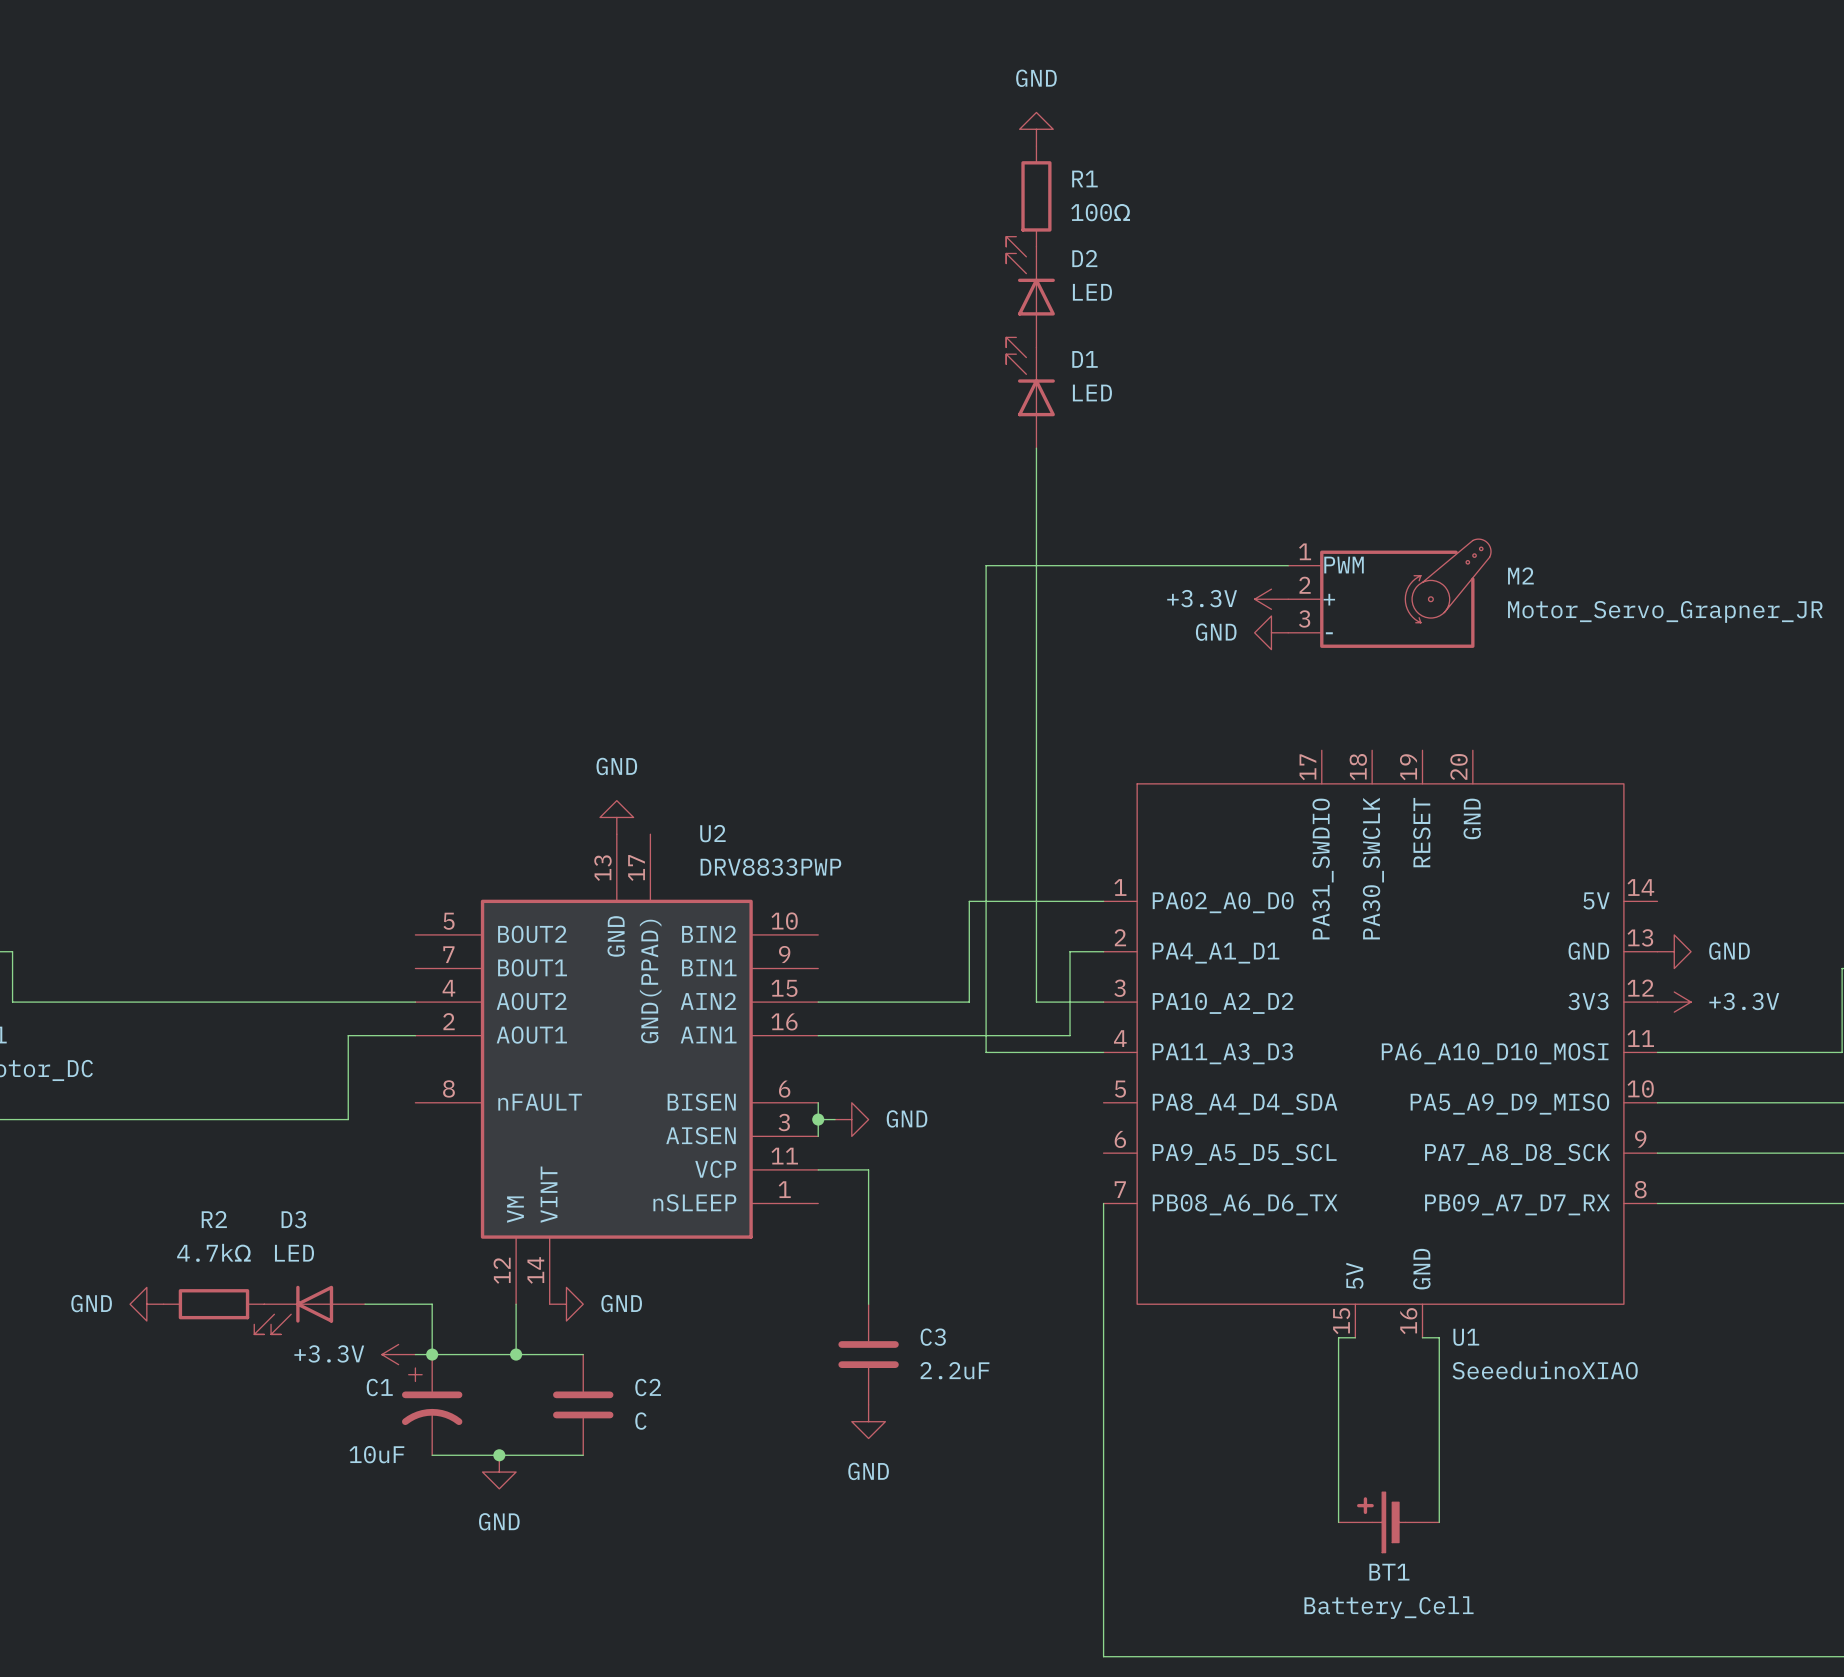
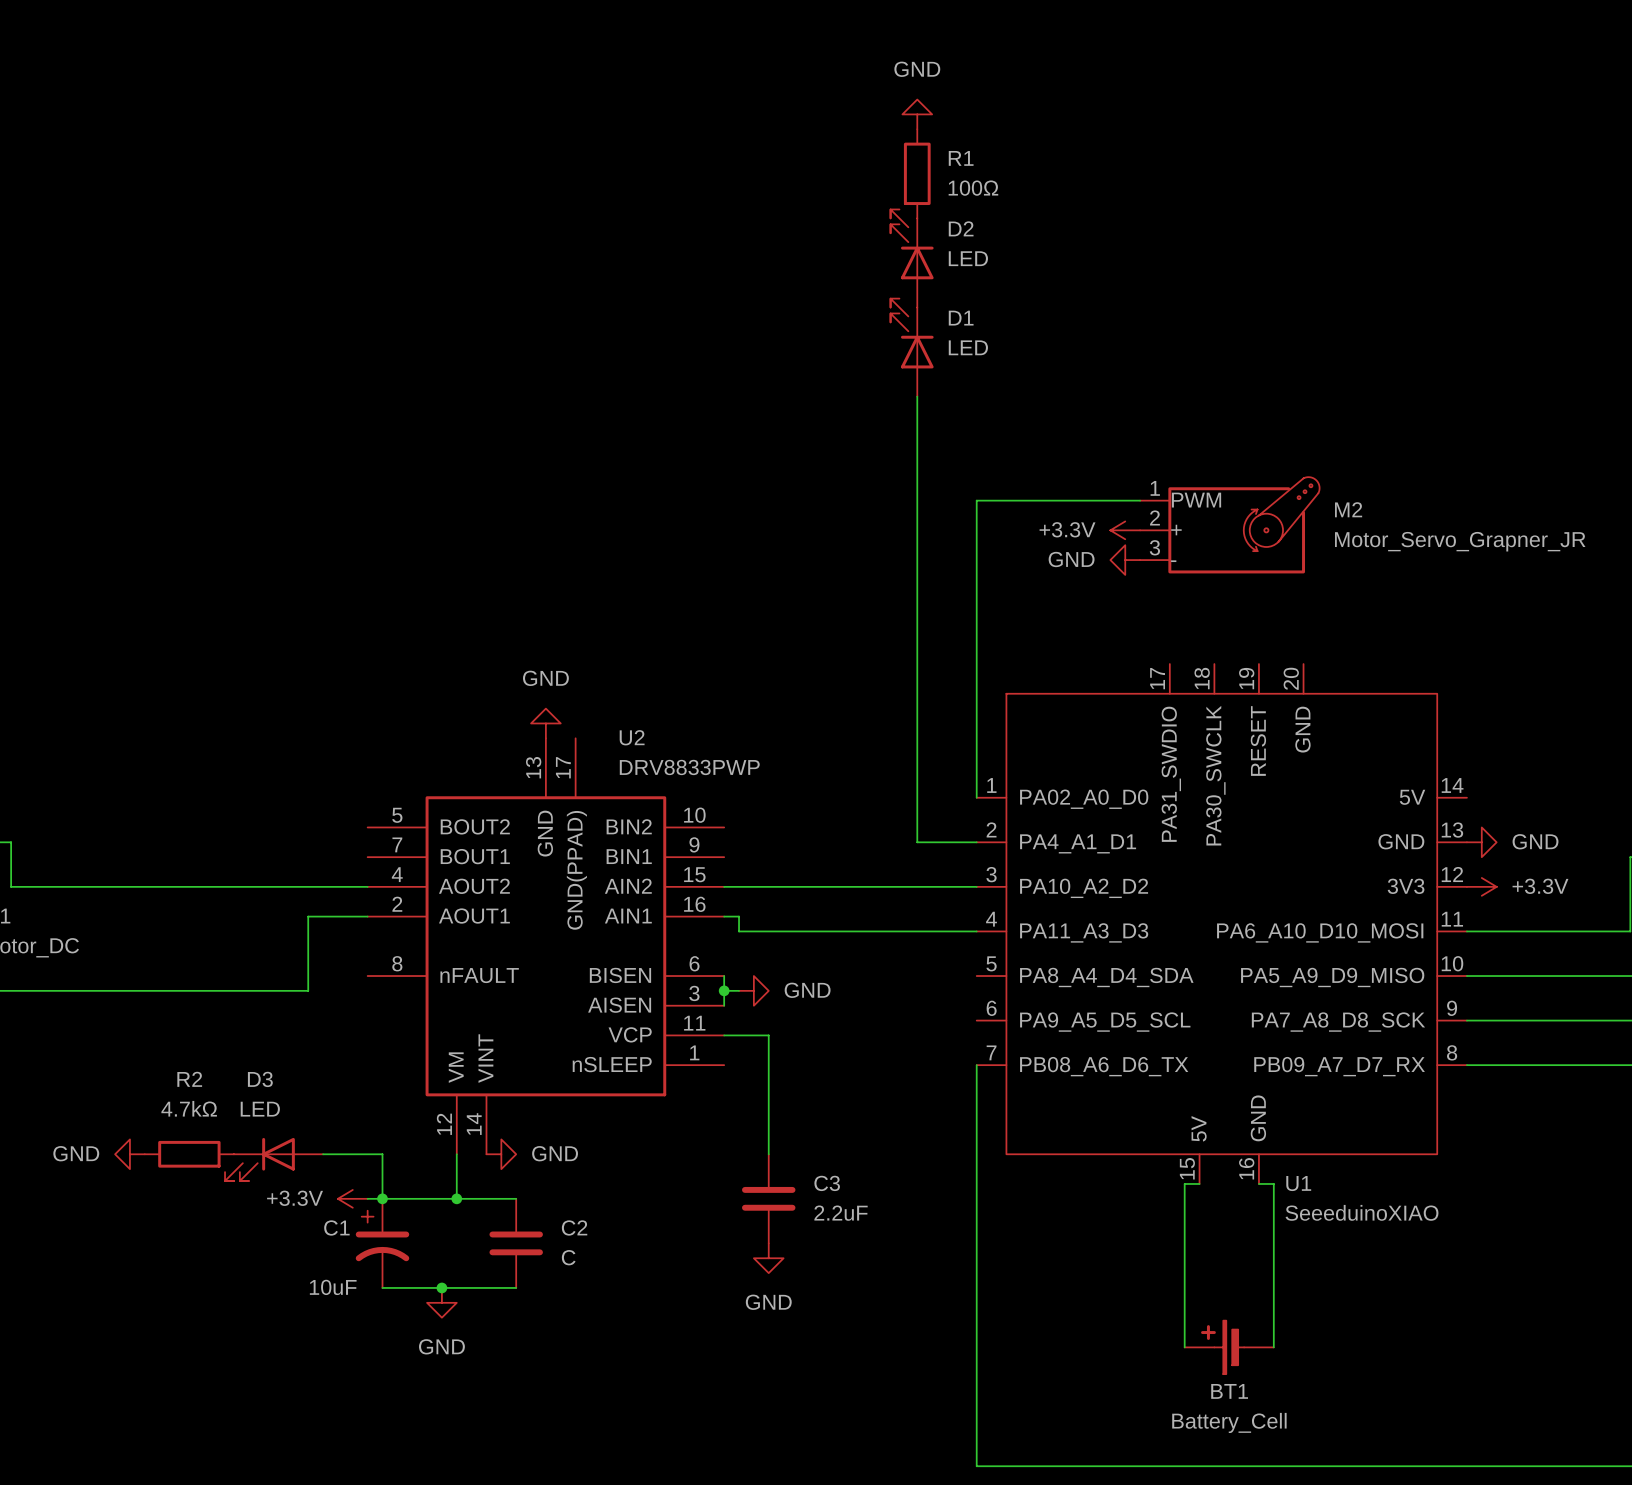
wire: (1103, 565) (986, 565) (986, 1052) -> (976, 500) (976, 797)
wire: (1103, 901) (969, 901) (969, 1002) -> (917, 886) (857, 886)
wire: (1036, 951) (1036, 1002) -> (917, 842) (947, 842)
wire: (1070, 951) (1070, 1035) (835, 1035) -> (872, 931) (739, 931) (739, 916)

